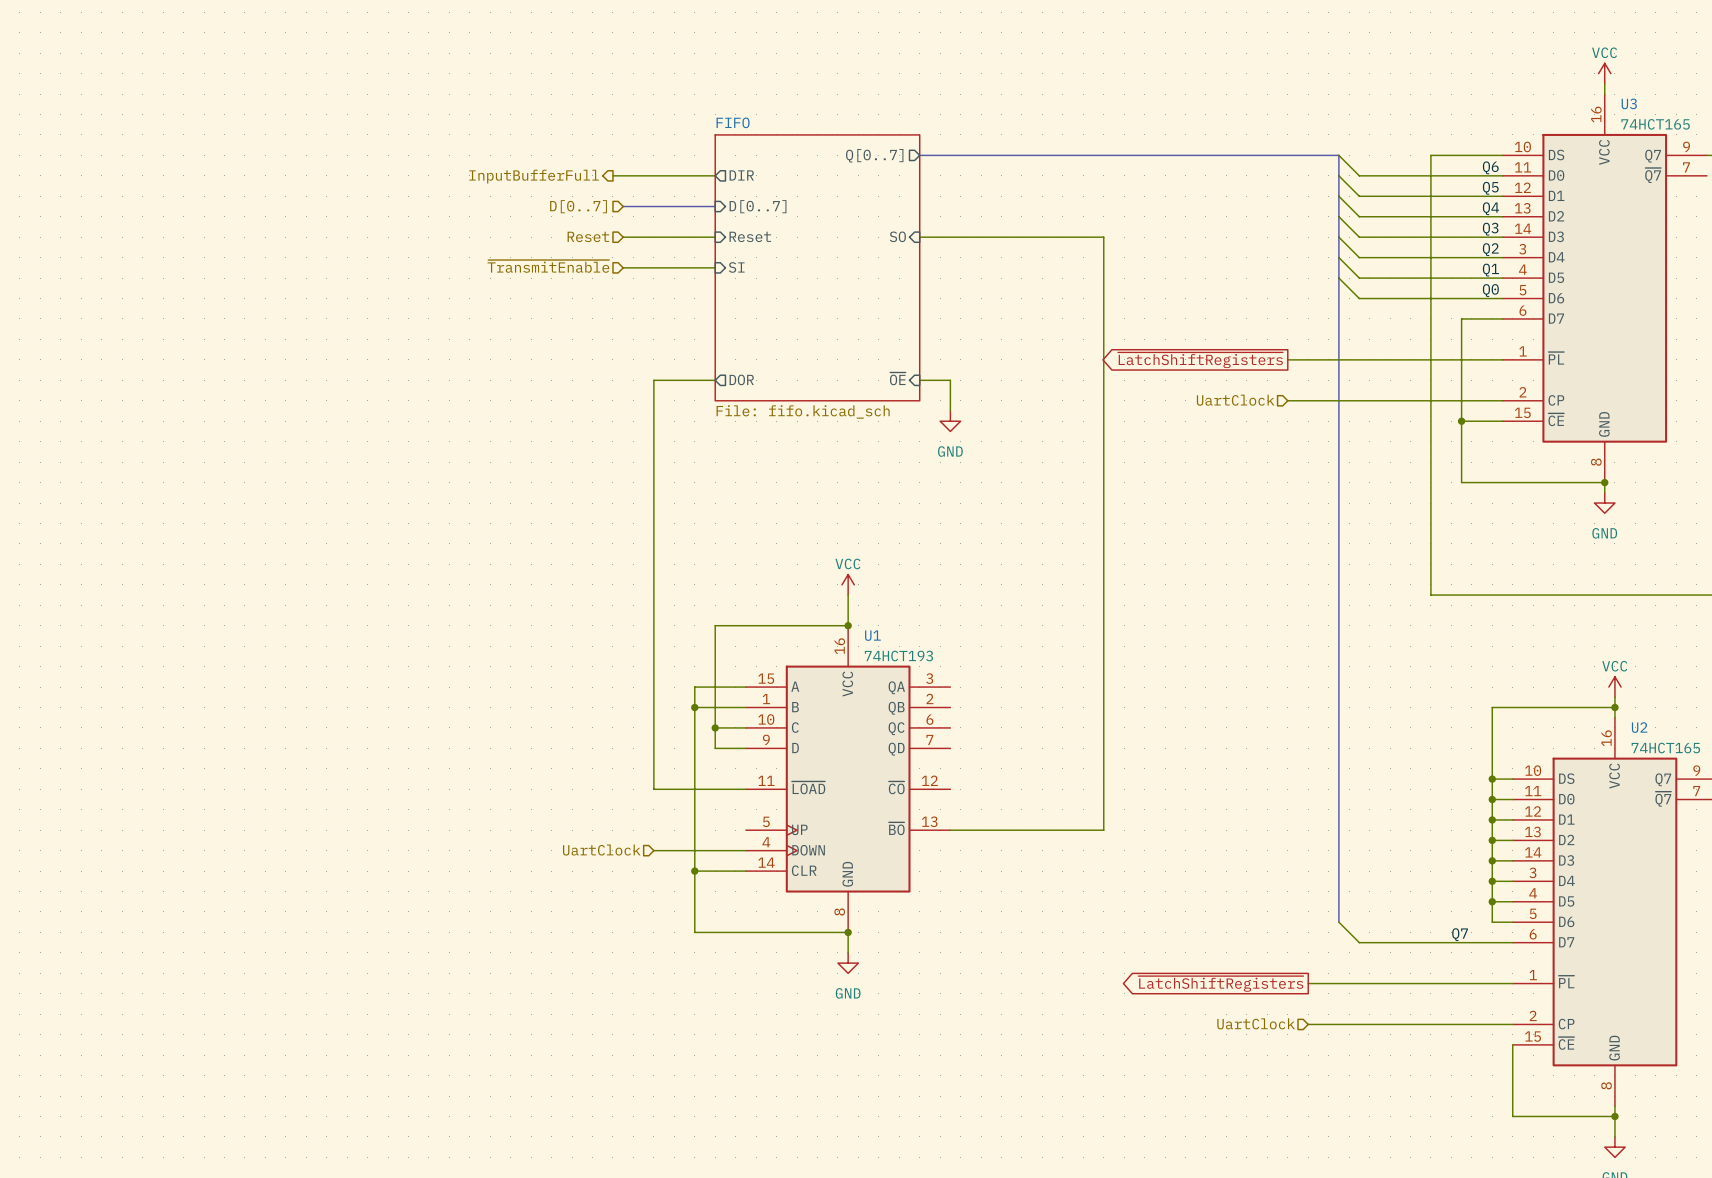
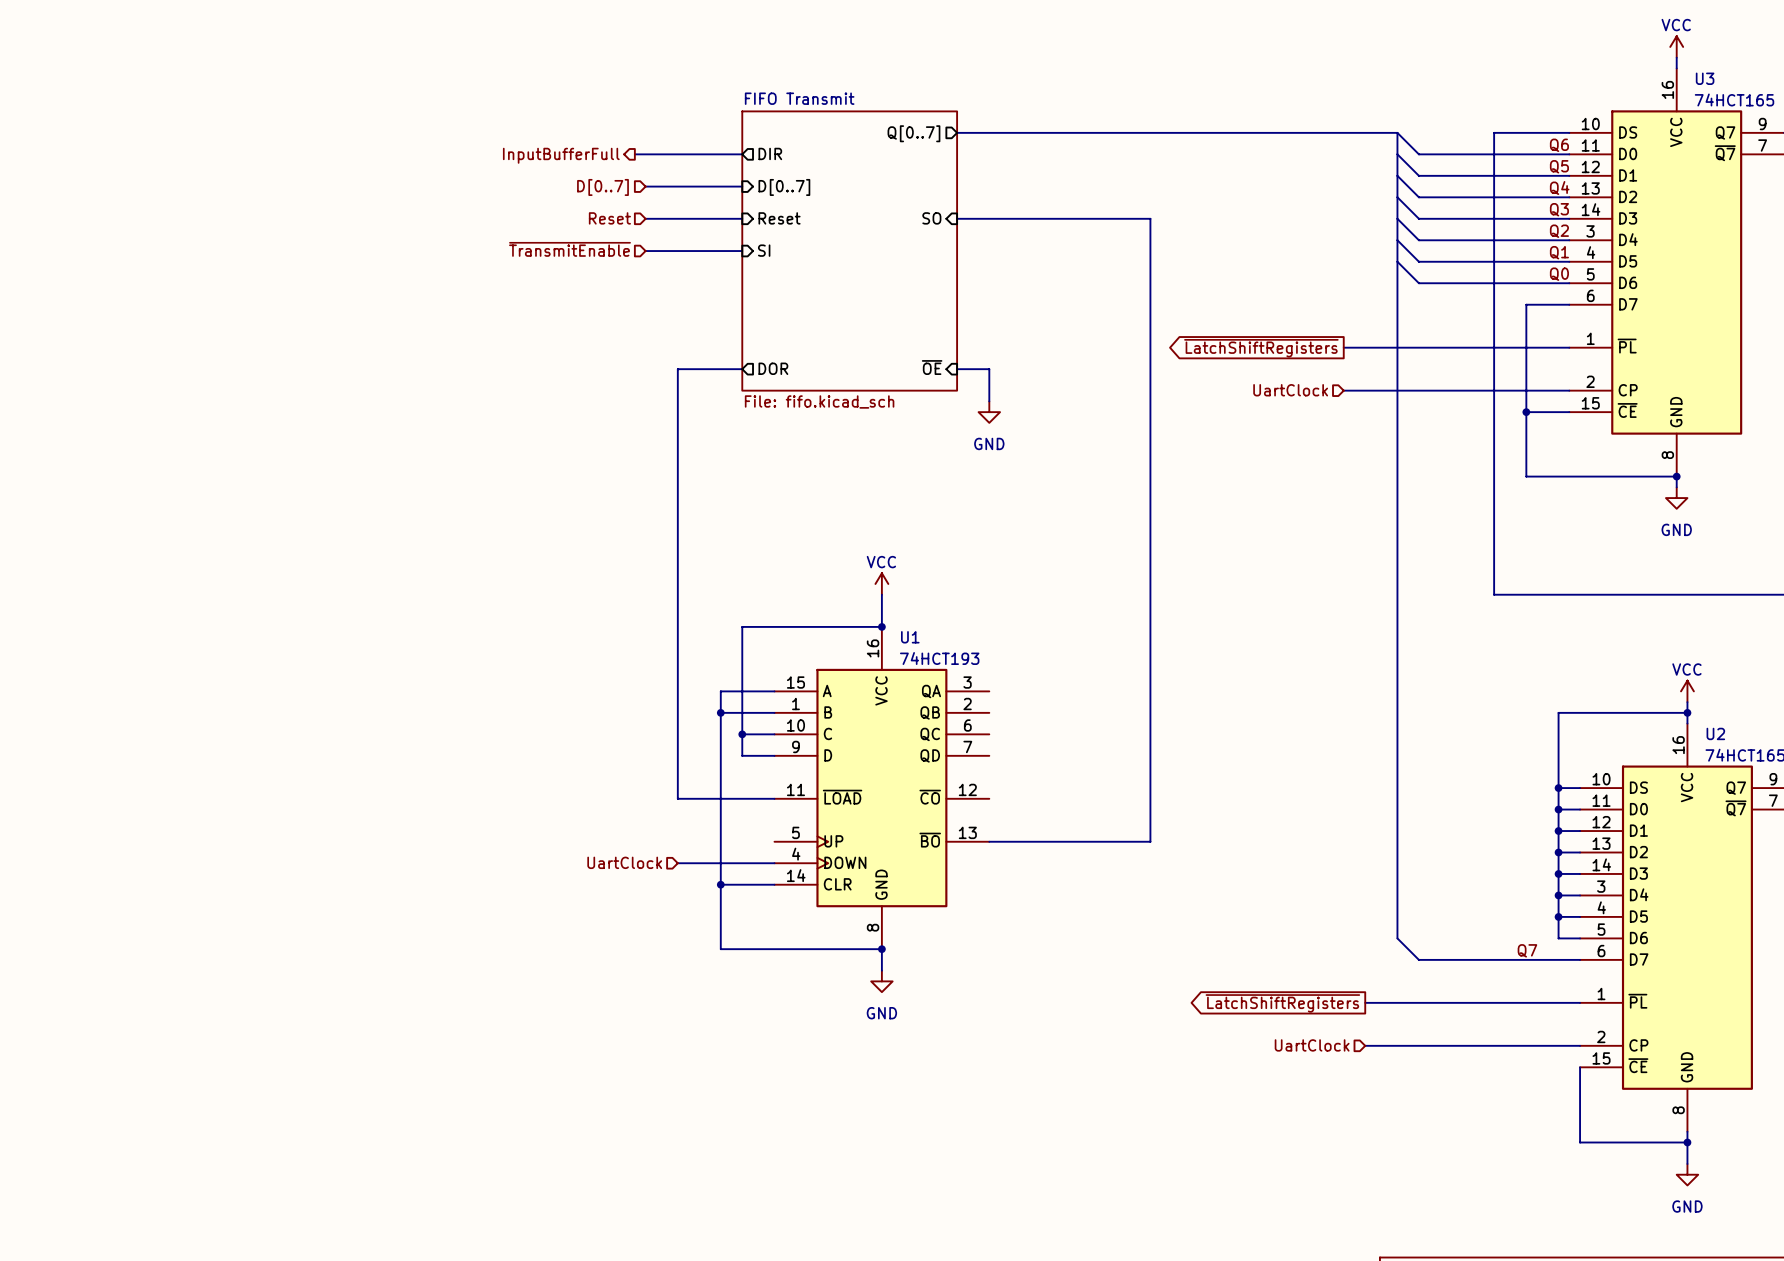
sheet FIFO name: FIFO (733, 122) -> FIFO Transmit (799, 98)

